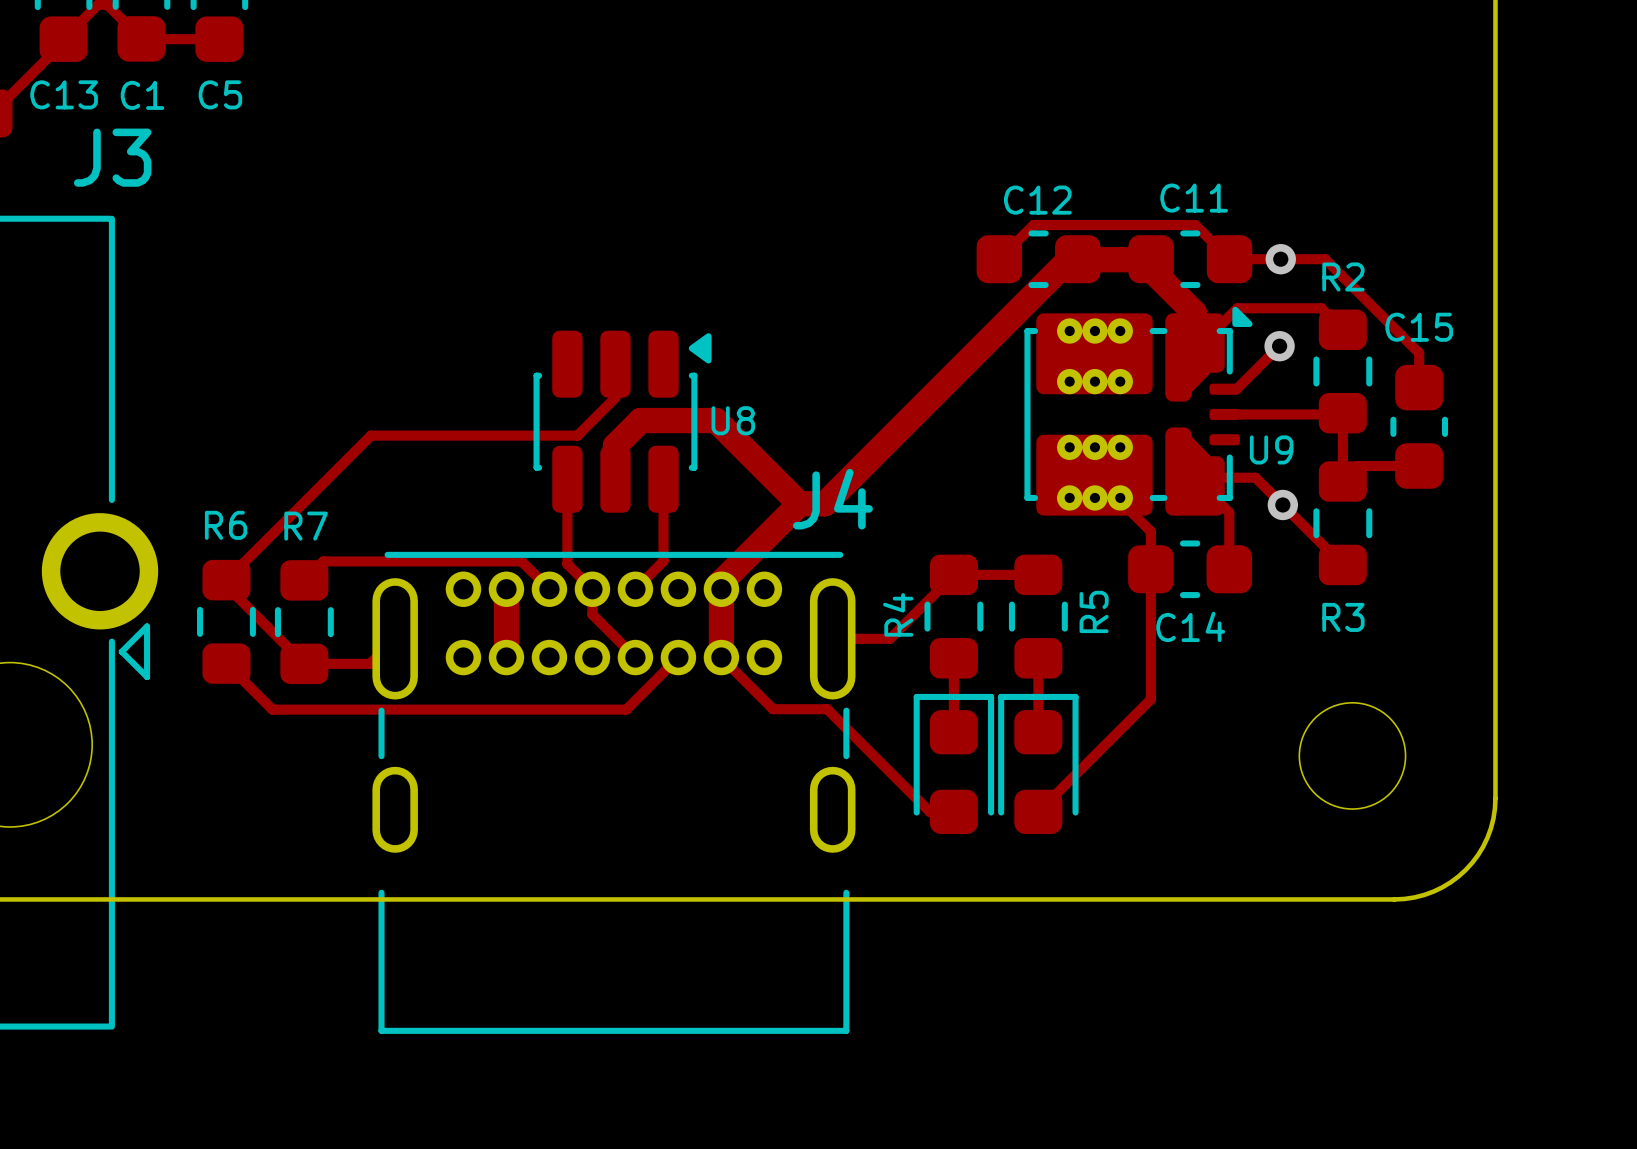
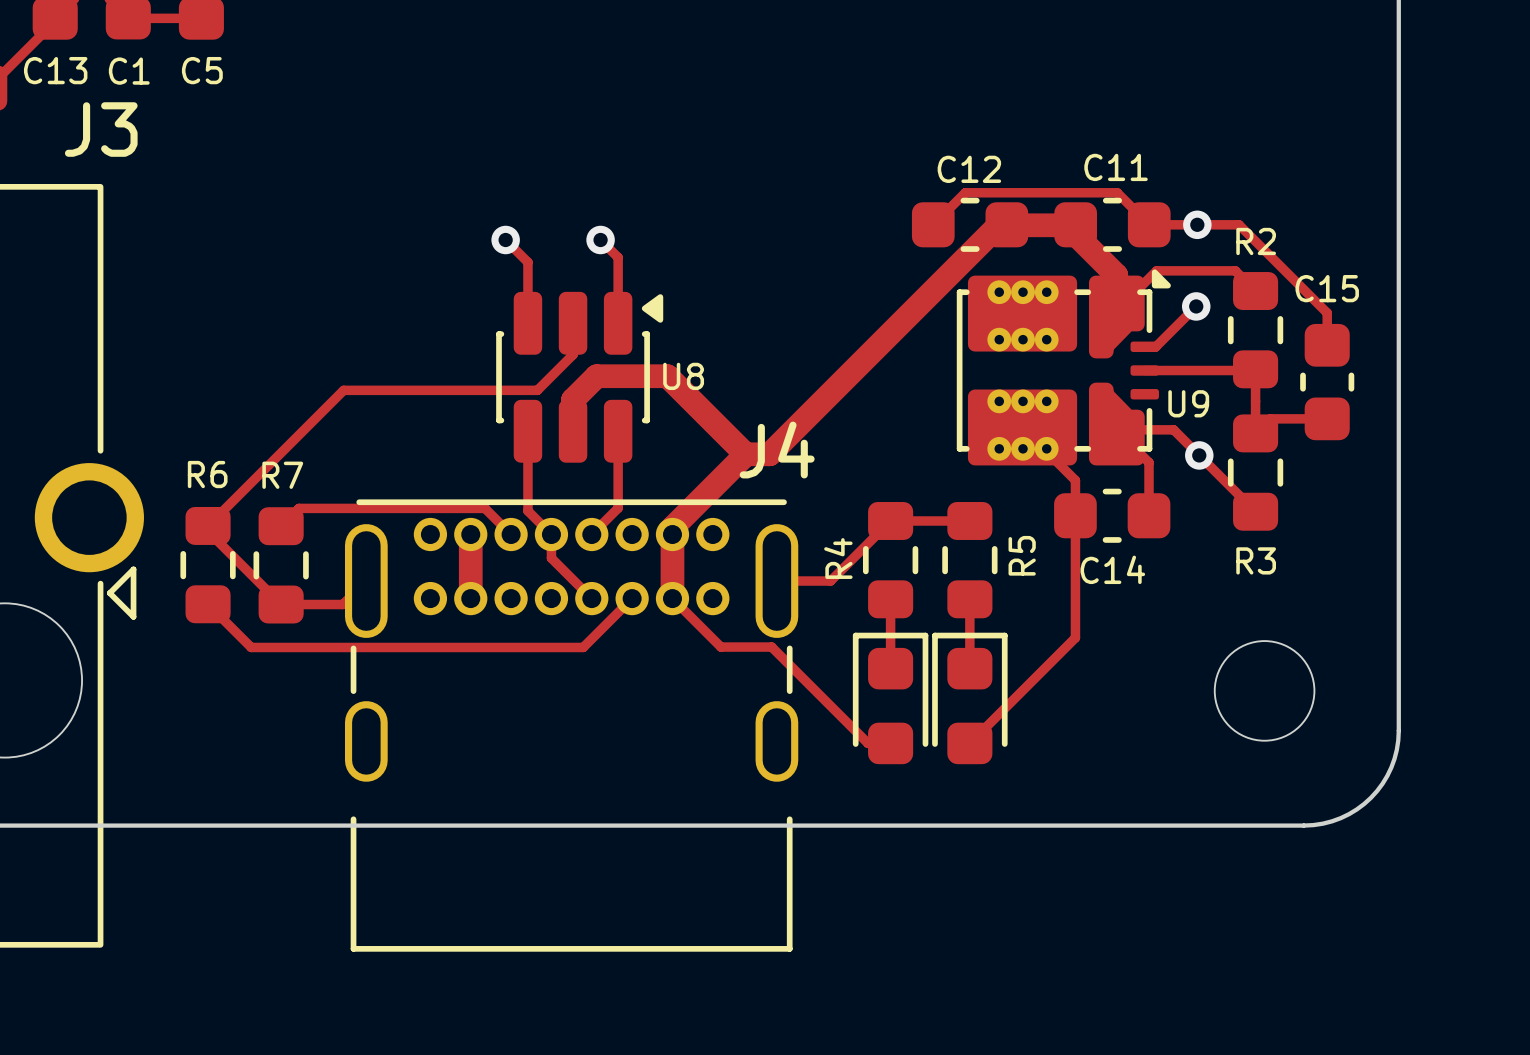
track: none -> (505, 239) (527, 262) (527, 323)
via: none -> (505, 239)
track: none -> (600, 239) (618, 257) (618, 323)
via: none -> (600, 239)

